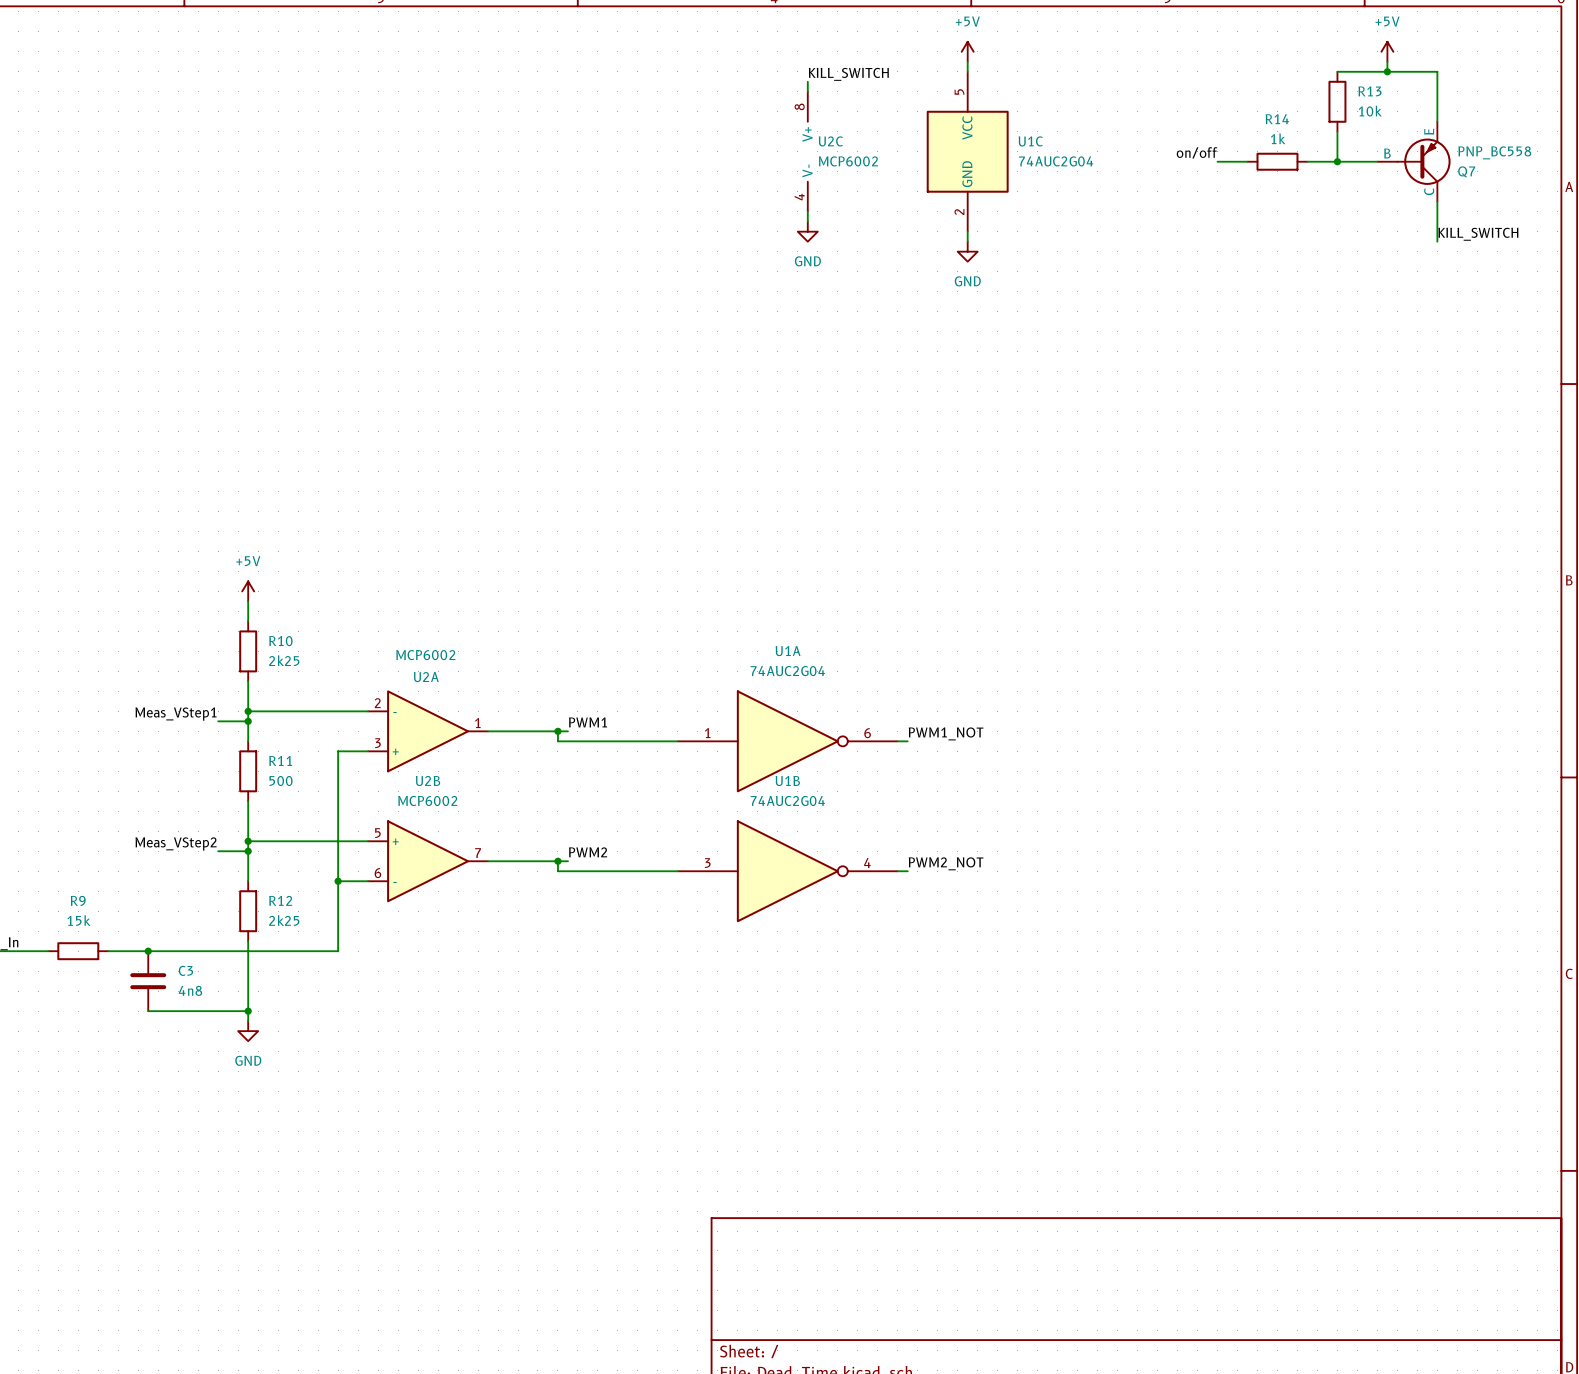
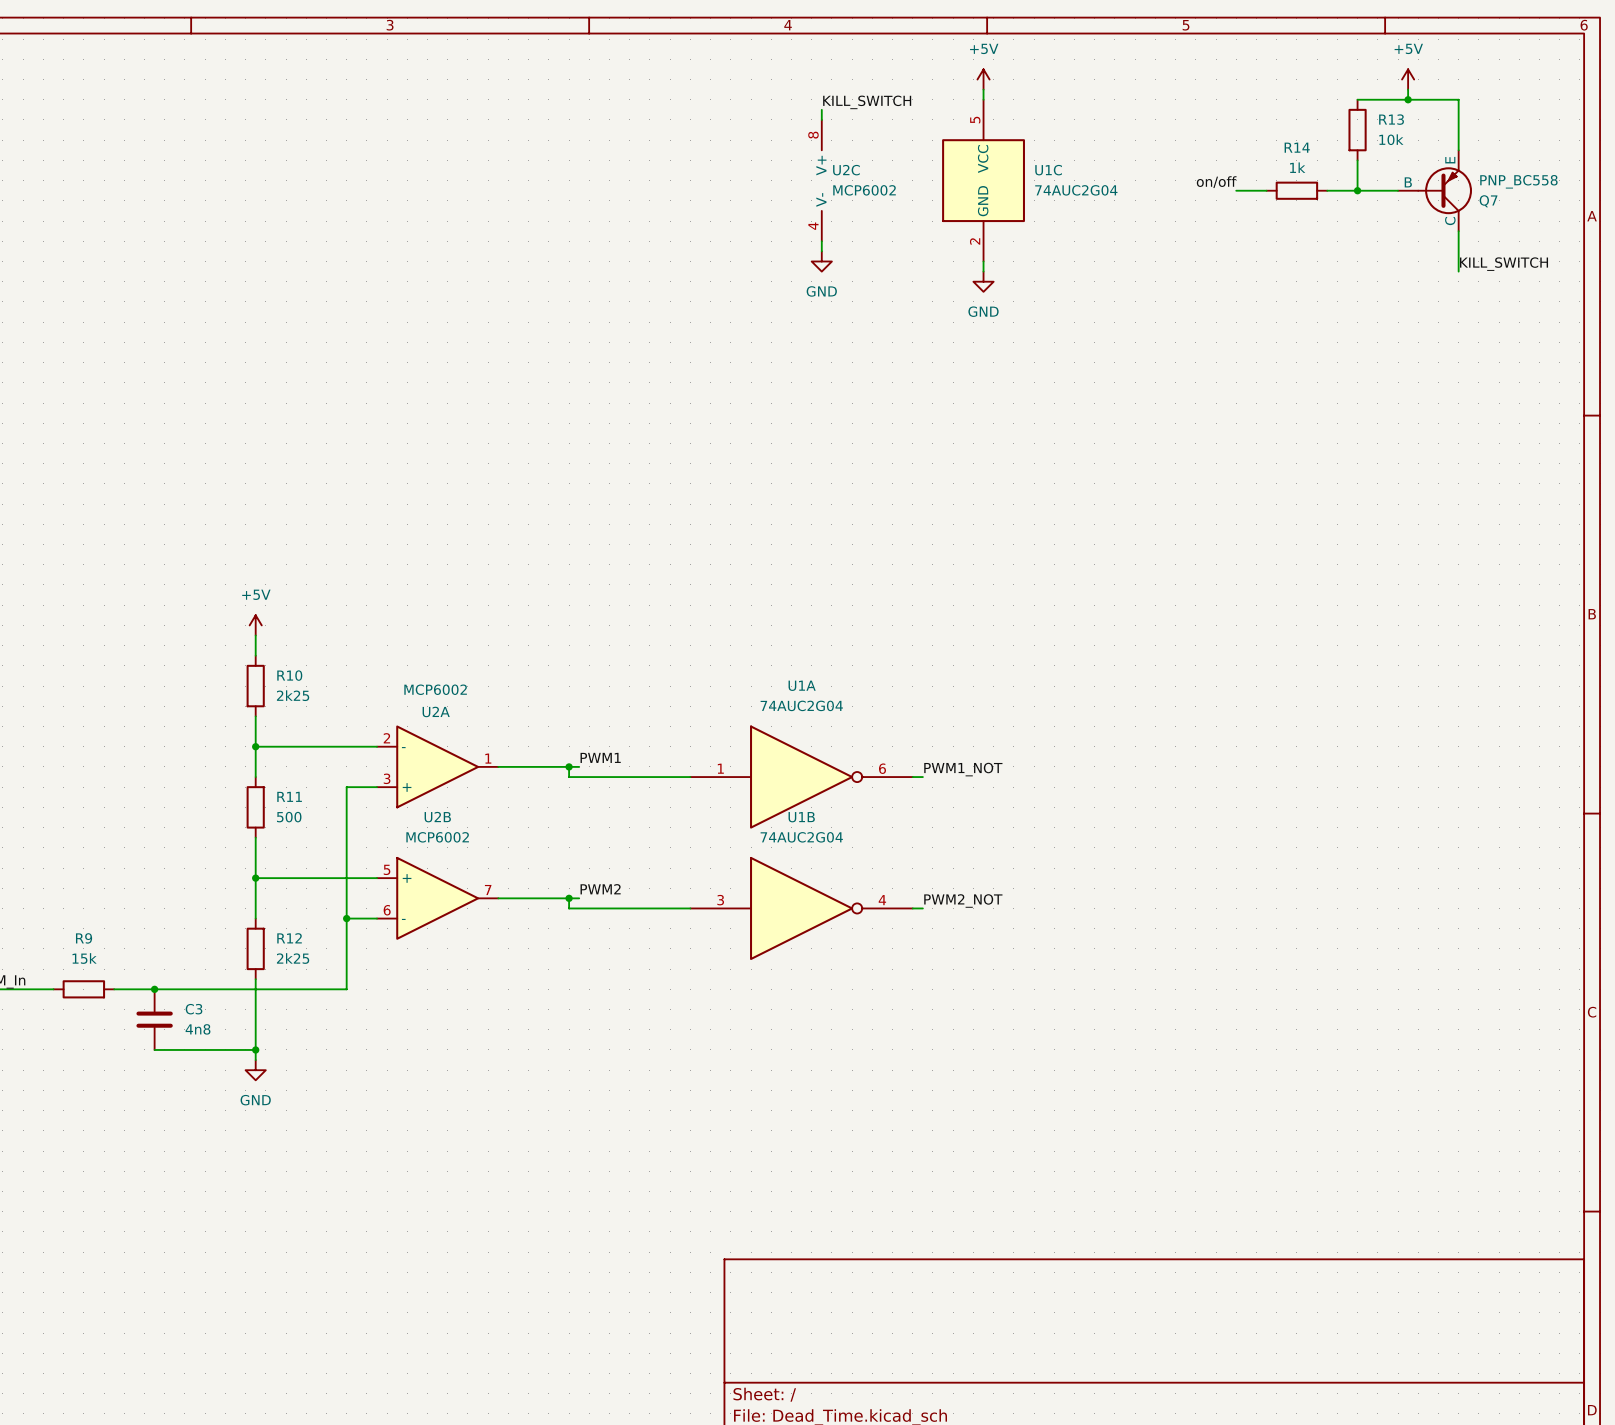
label: Meas_VStep1 (176, 714) -> none
wire: (218, 721) (248, 721) -> none
junction: (248, 721) -> none
label: Meas_VStep2 (176, 843) -> none
wire: (218, 851) (248, 851) -> none
junction: (248, 851) -> none

